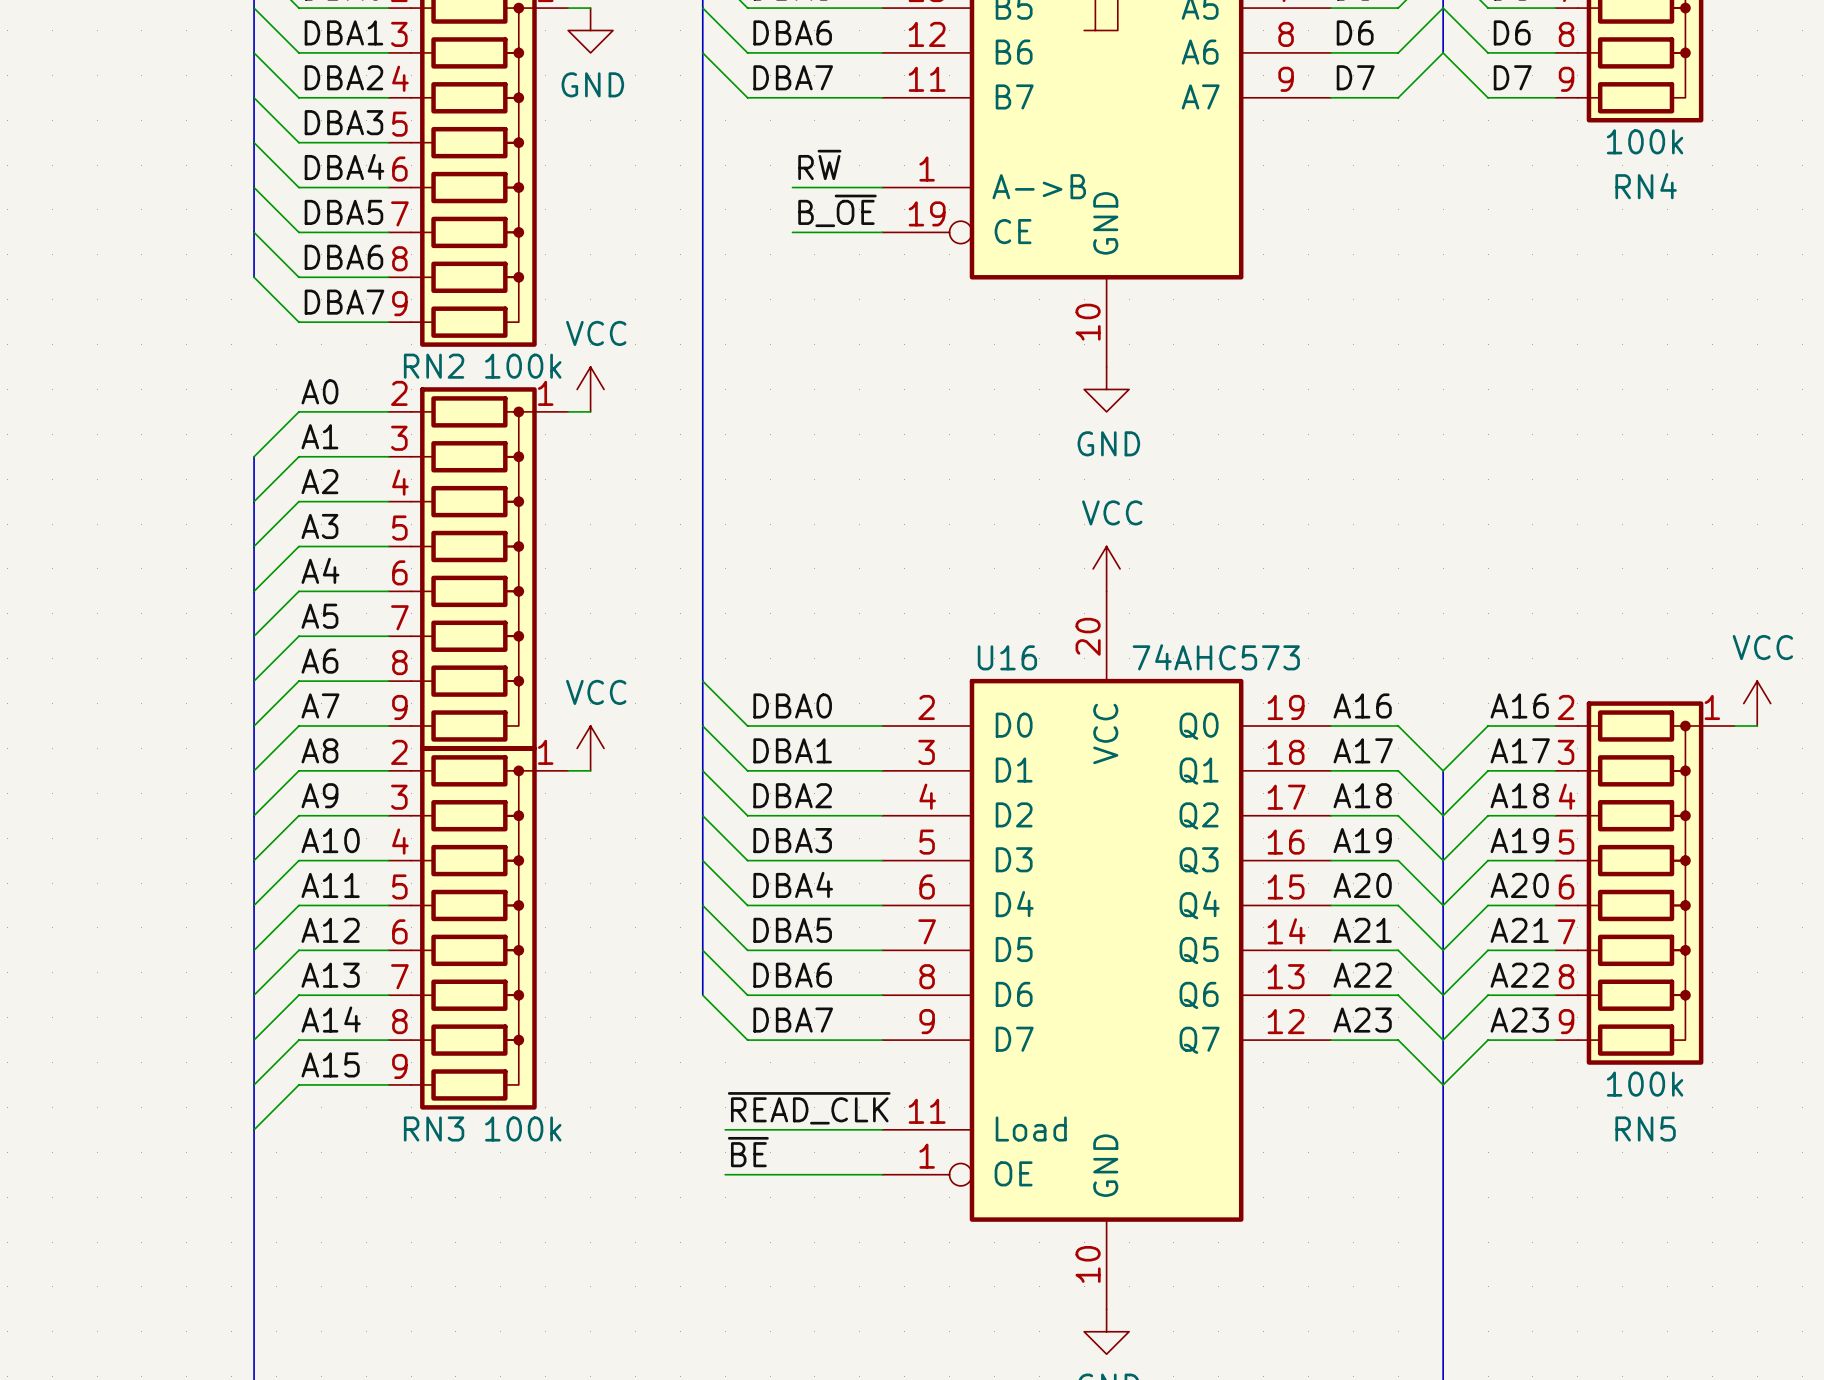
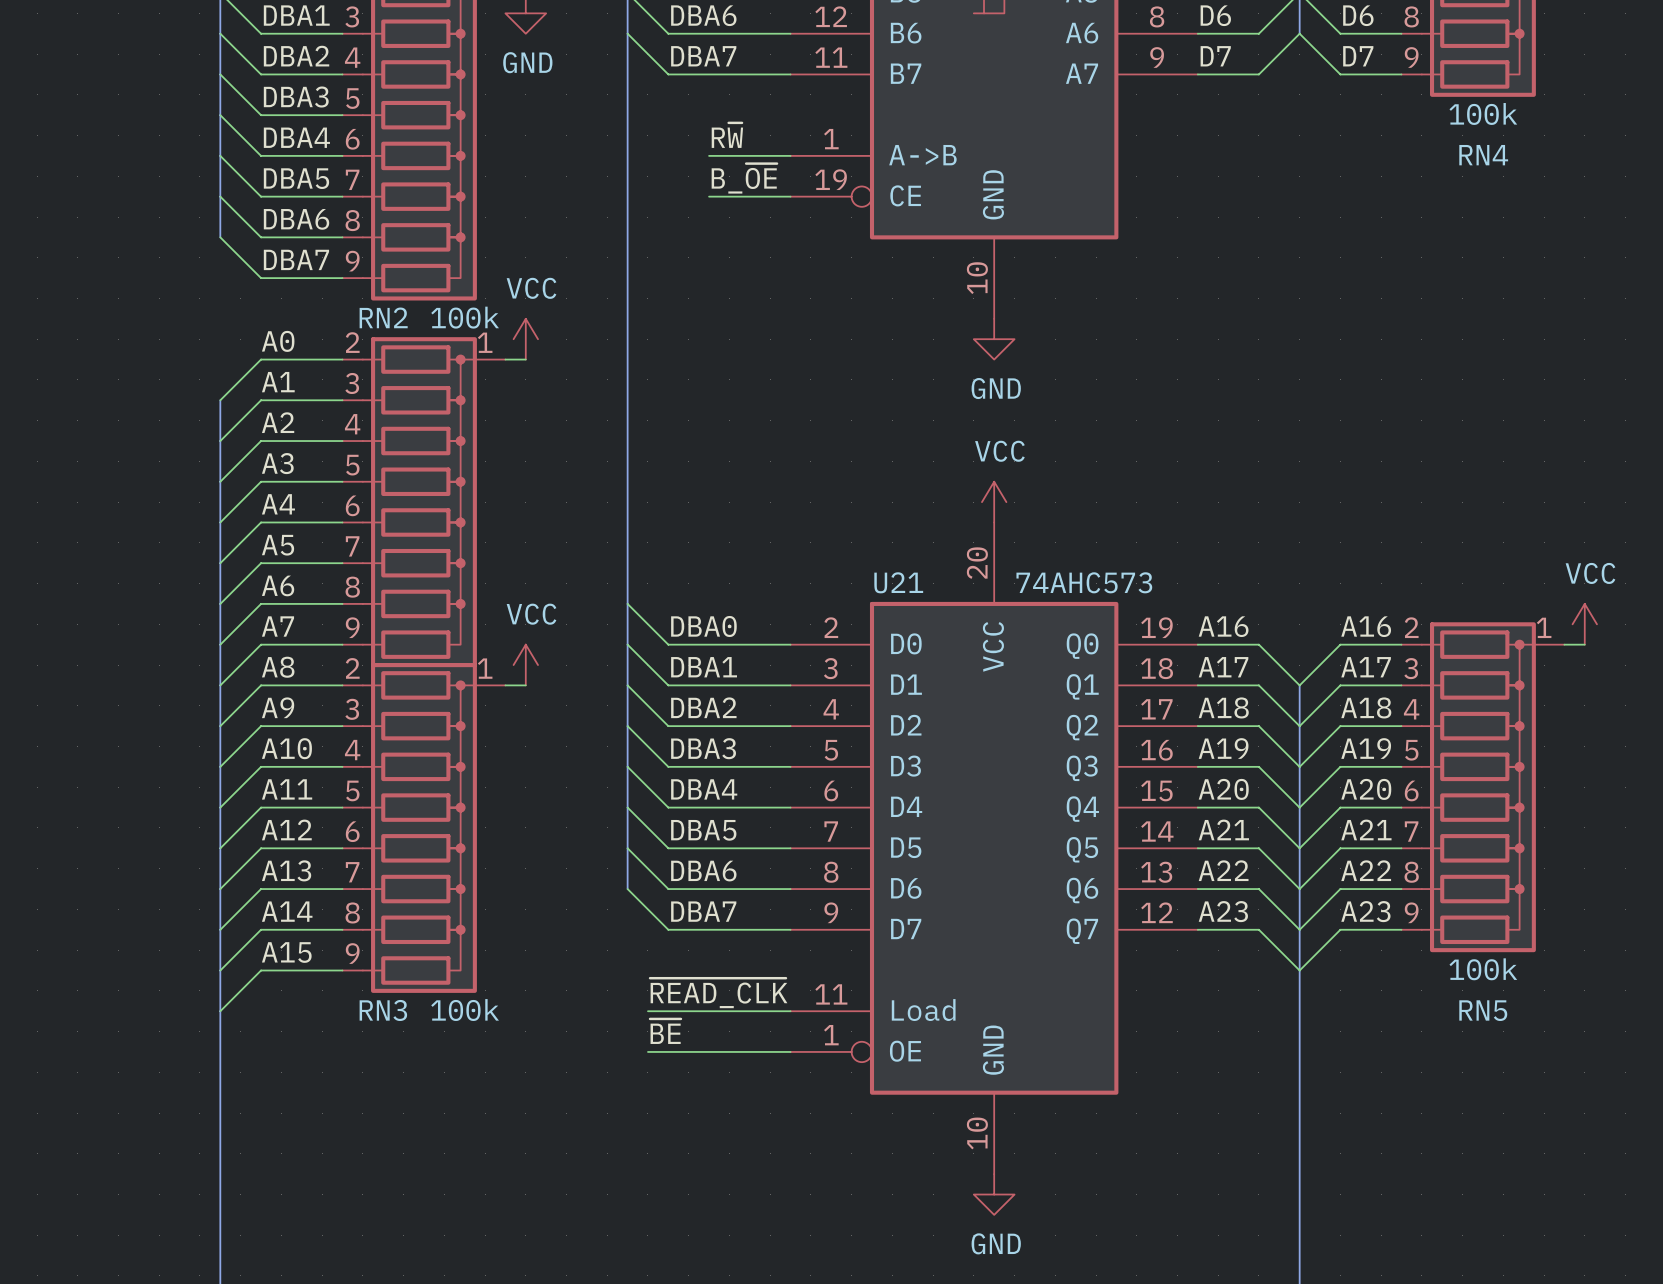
U16 name: U16 (1007, 657) -> U21 (898, 582)

